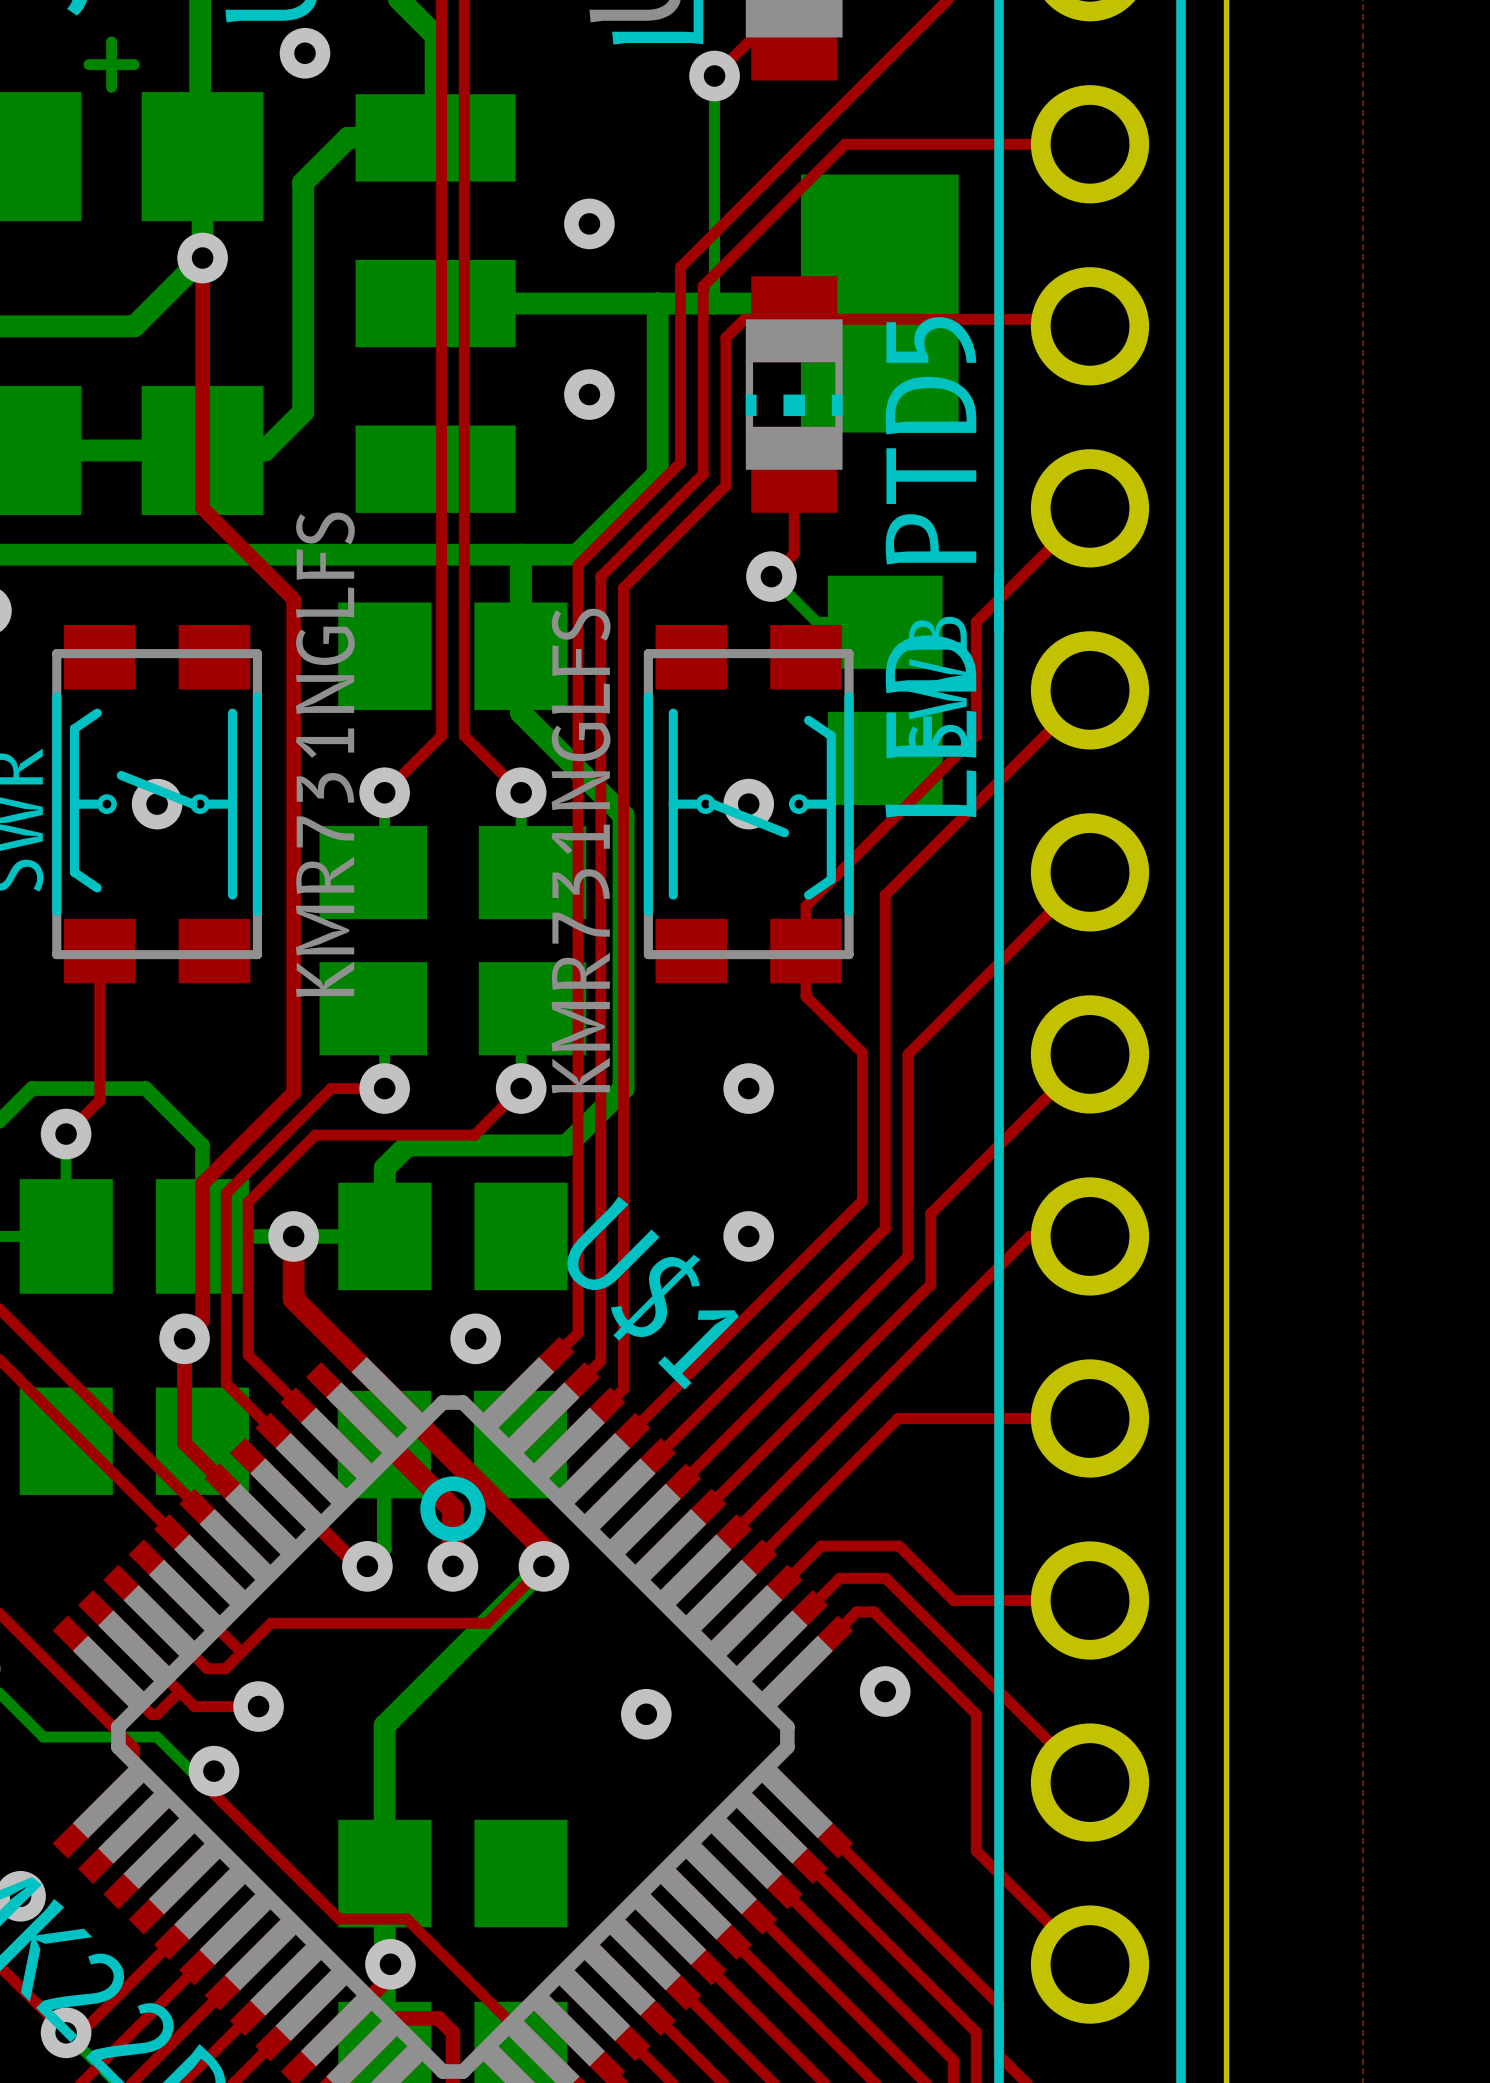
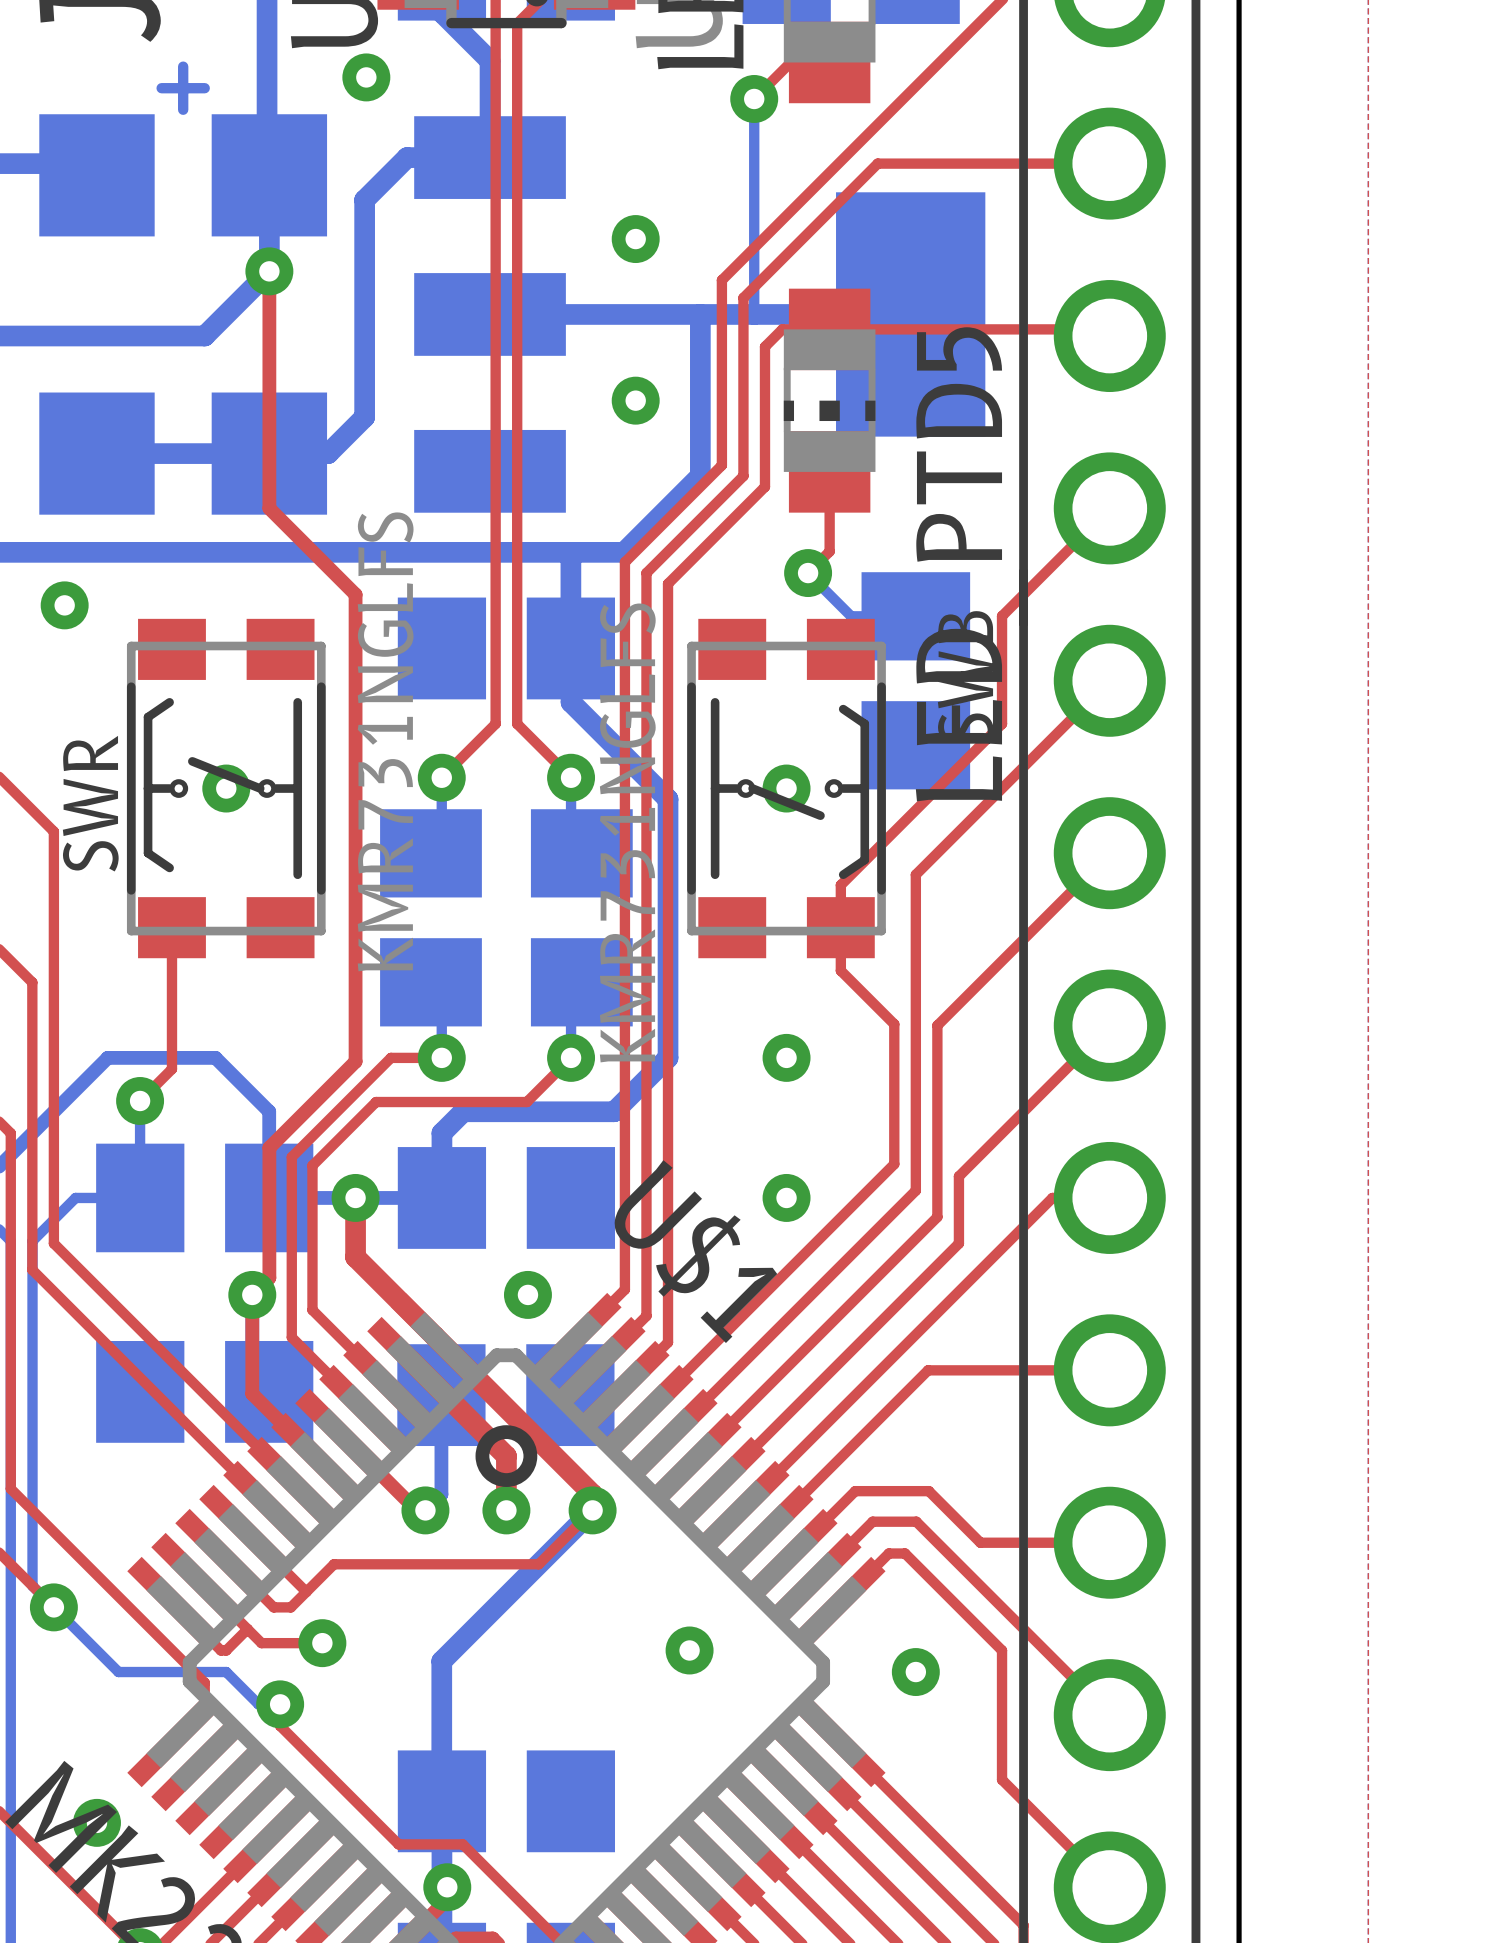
via position: (885, 1691) -> (915, 1672)

